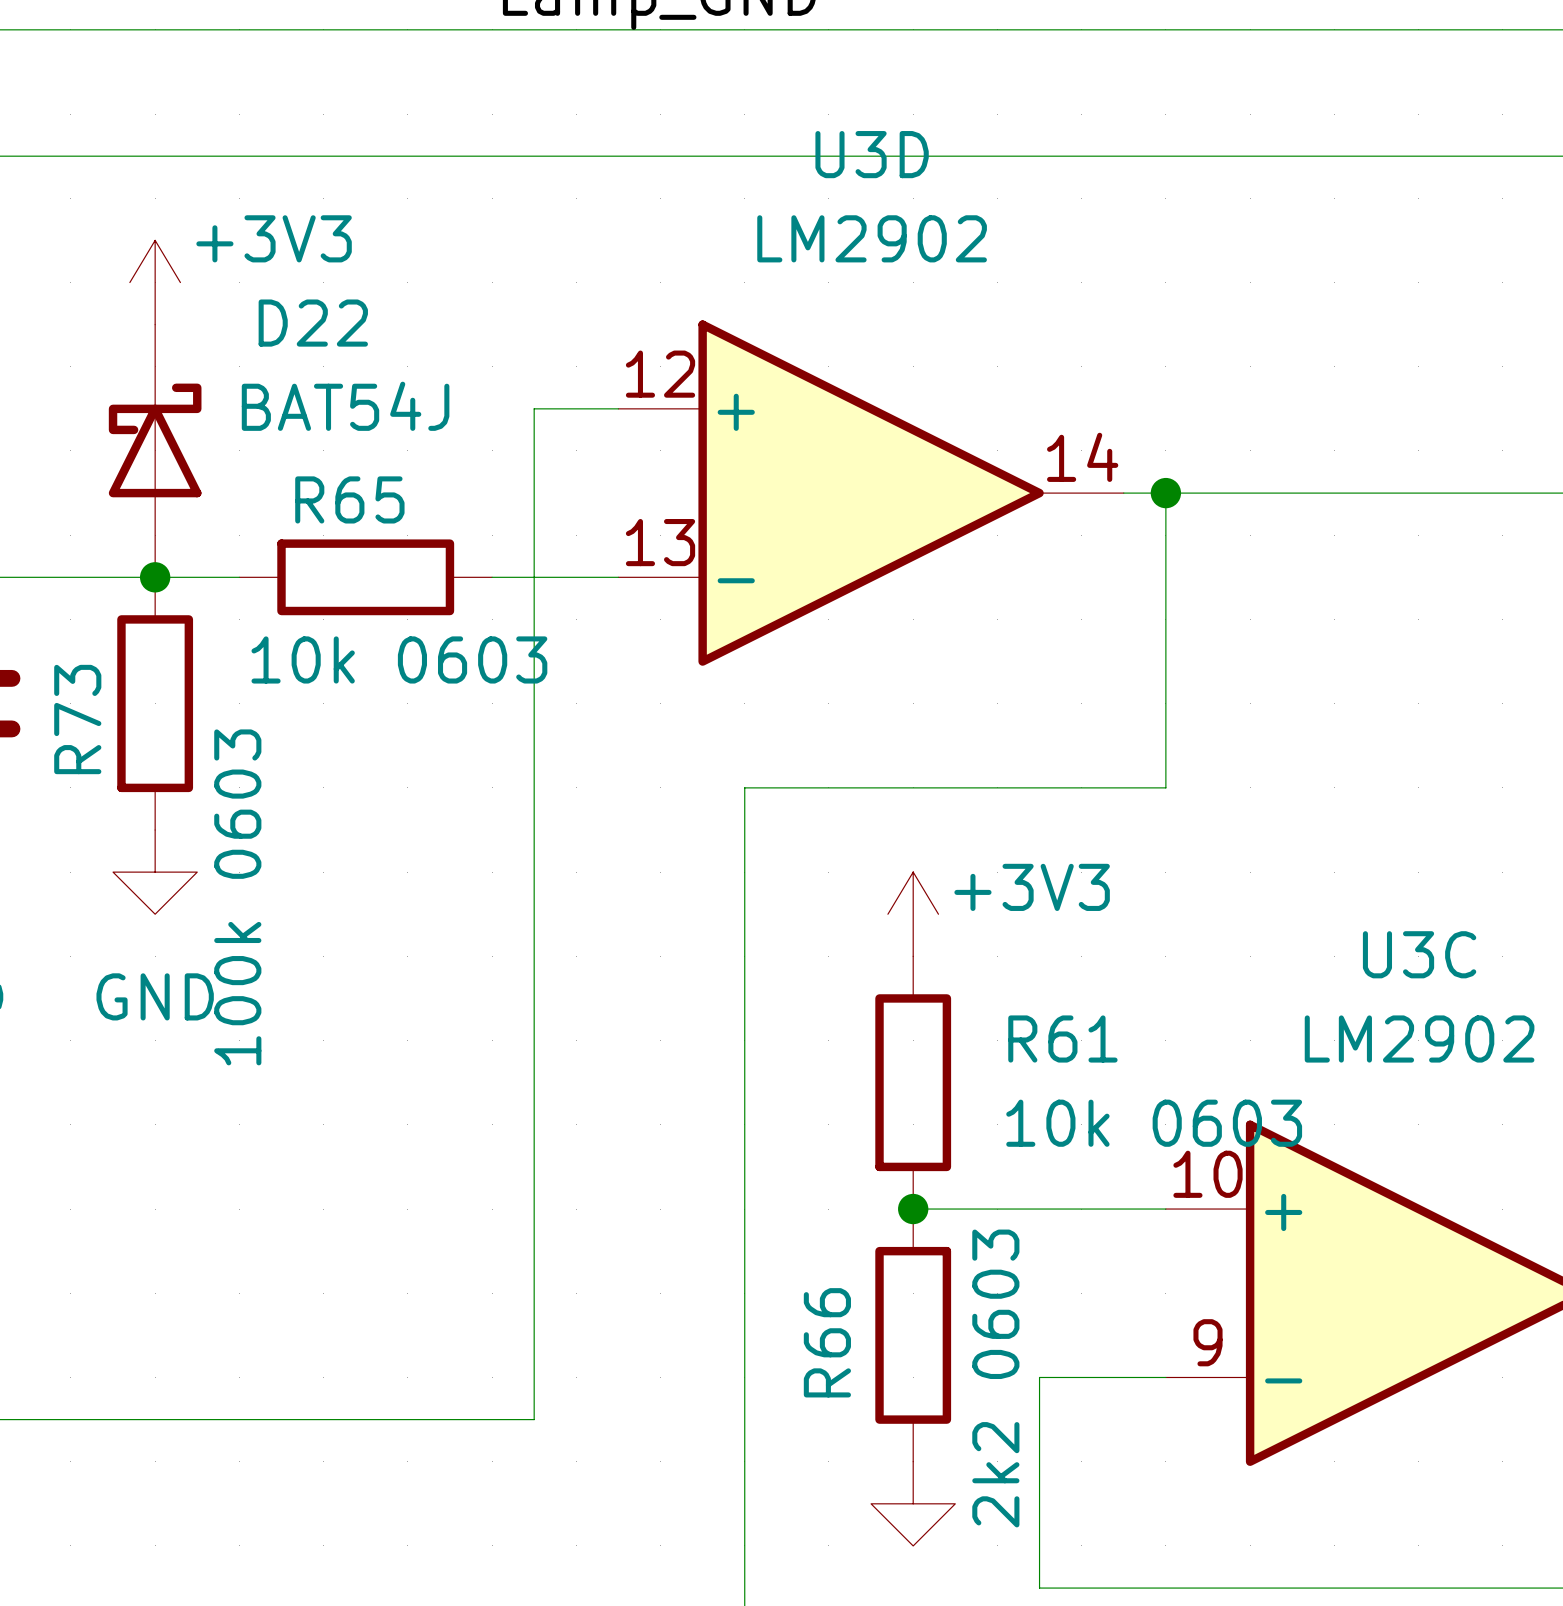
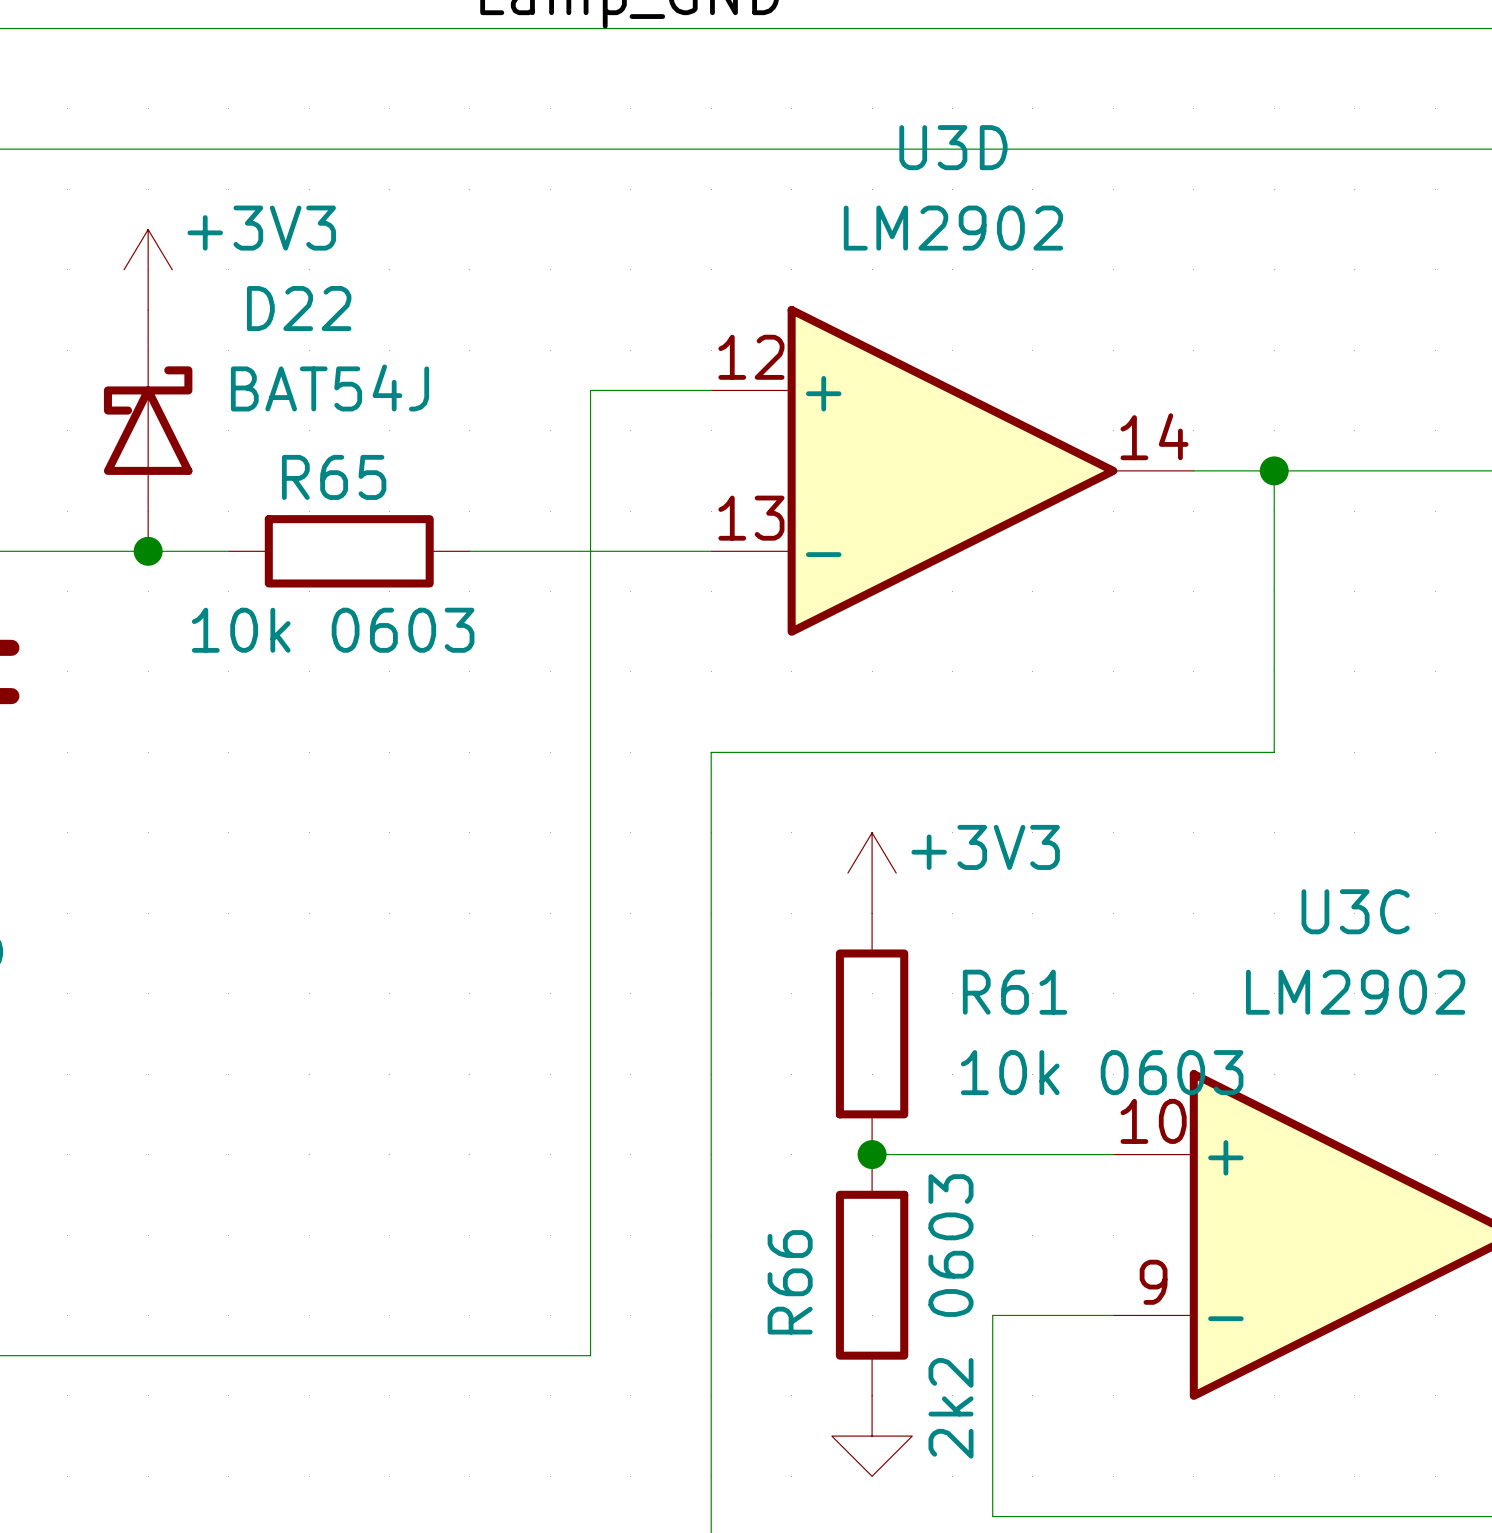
wire: (618, 408) (534, 408) (534, 1419) -> (711, 390) (590, 390) (590, 1355) (510, 1355)
U3D position: (871, 493) -> (952, 470)
wire: (1165, 493) (1165, 787) -> (1274, 470) (1274, 752) (1113, 752)
junction position: (1165, 493) -> (1274, 470)
R65 value position: 10k 0603 (399, 659) -> 10k 0603 (333, 630)
R73: 100k 0603 (155, 703) -> none
power symbol: GND (155, 872) -> none

